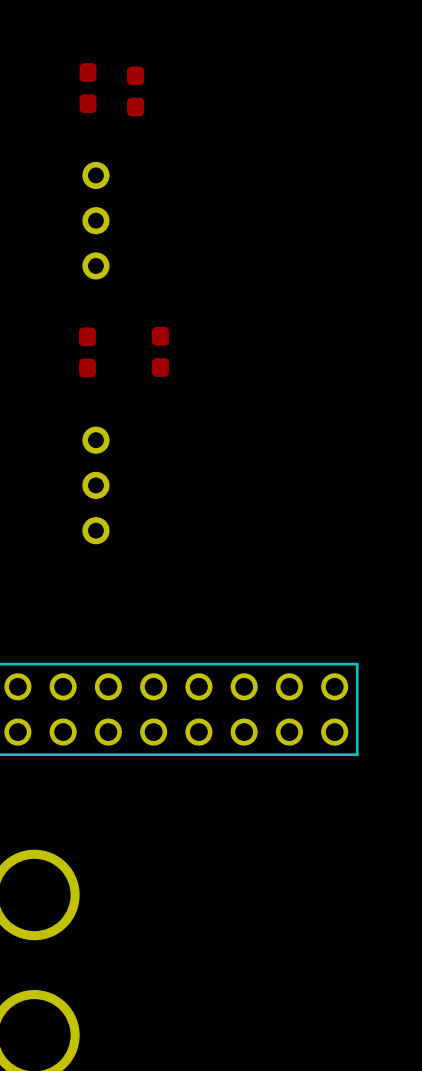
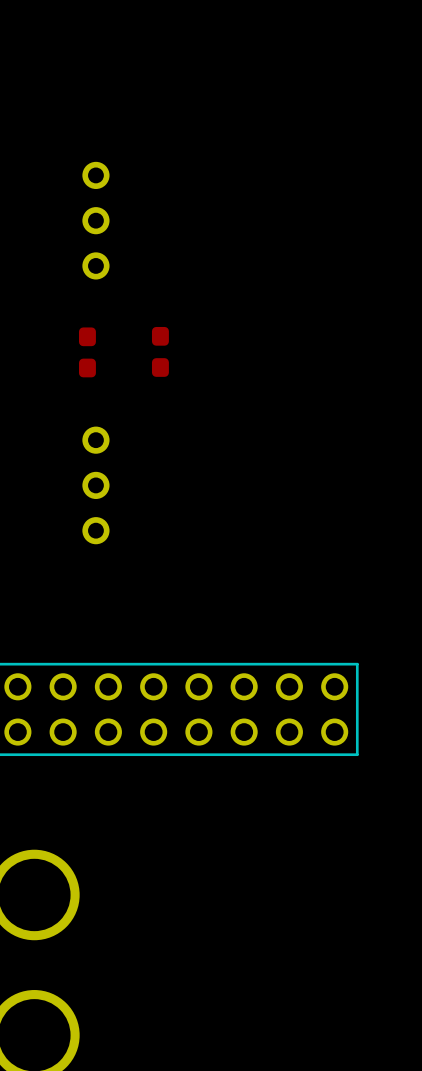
part: (88, 88) -> none
part: (135, 91) -> none

